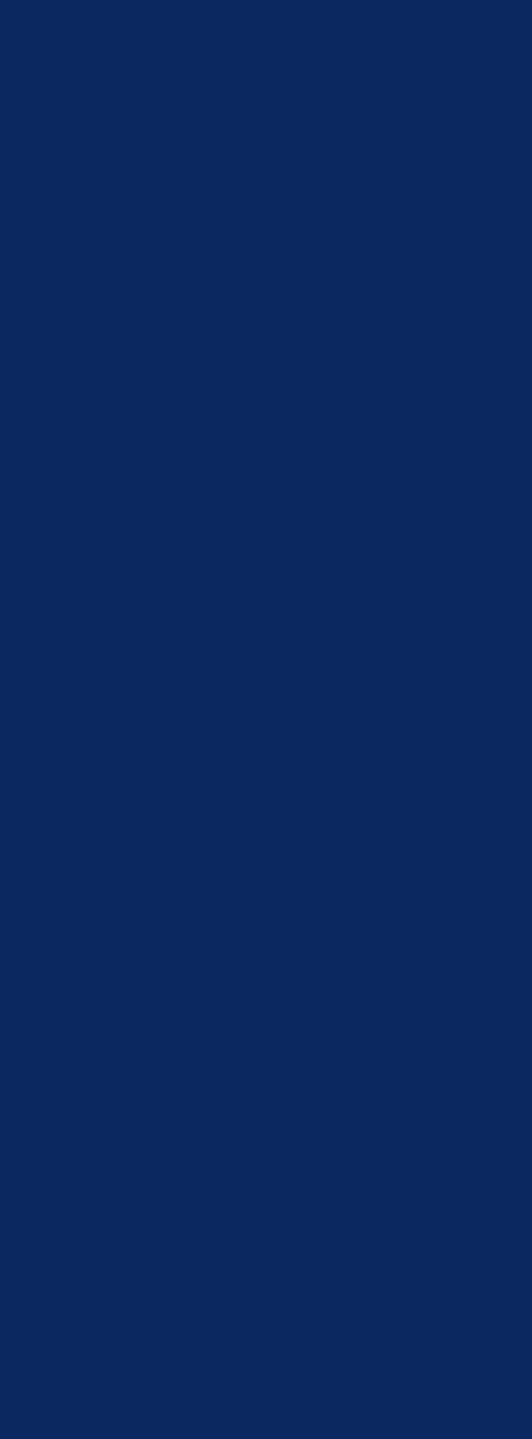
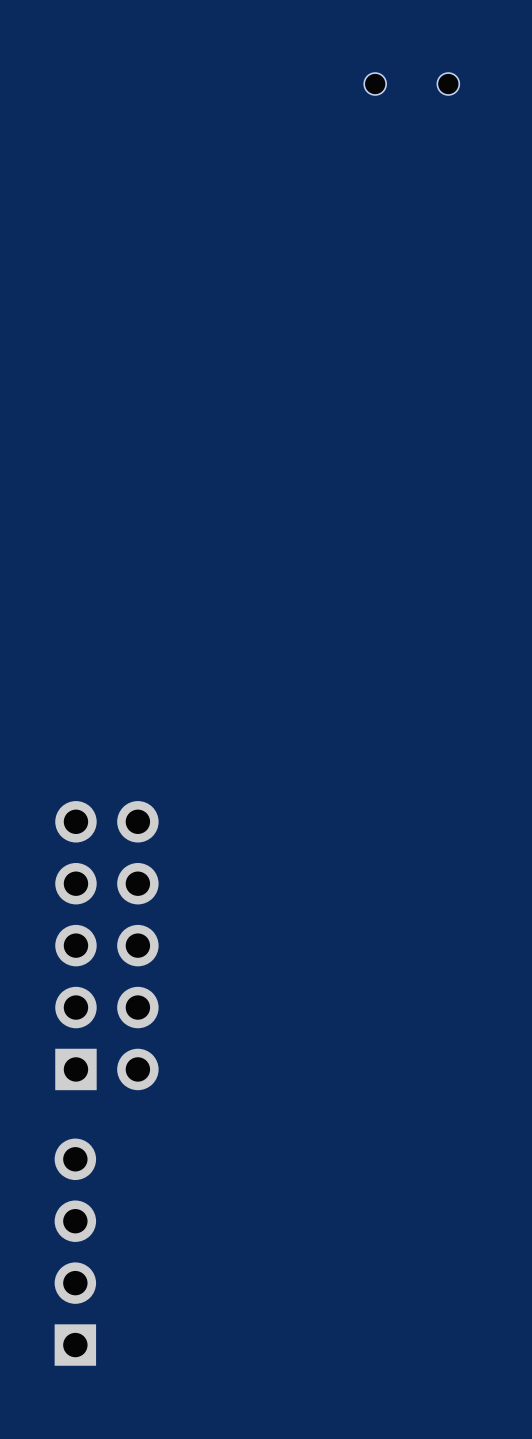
part: none -> (411, 84)
part: none -> (106, 945)
part: none -> (75, 1252)

